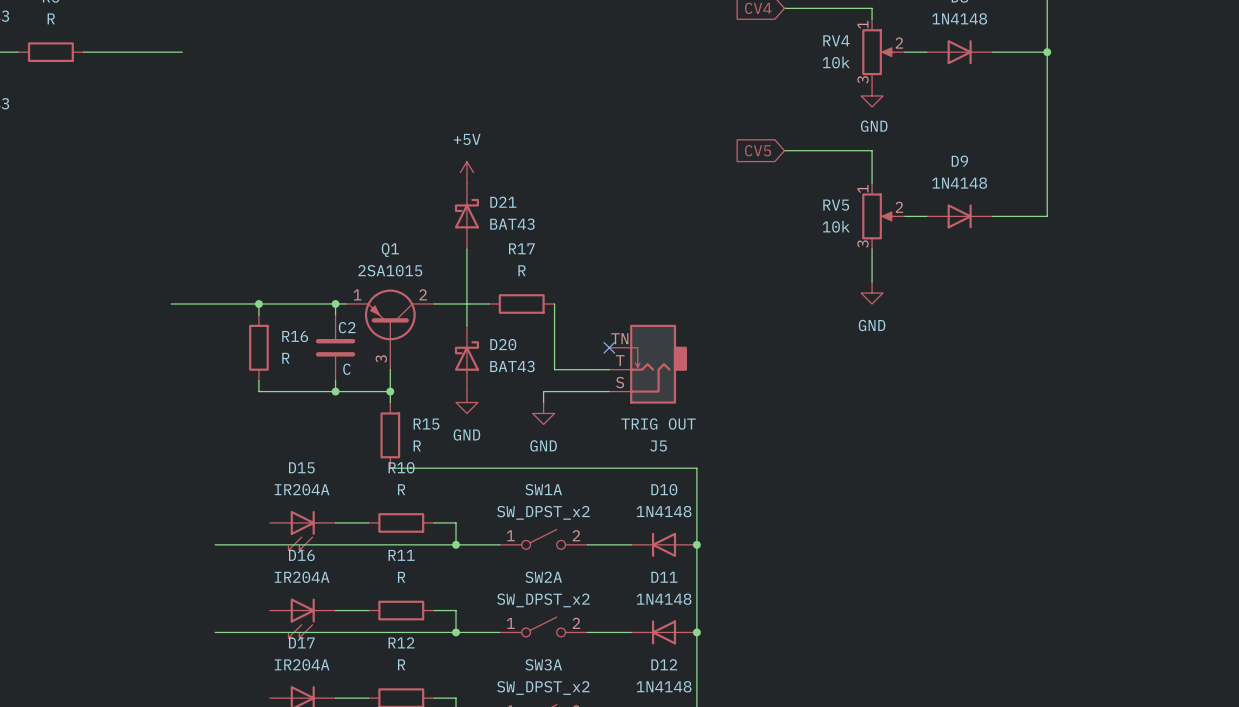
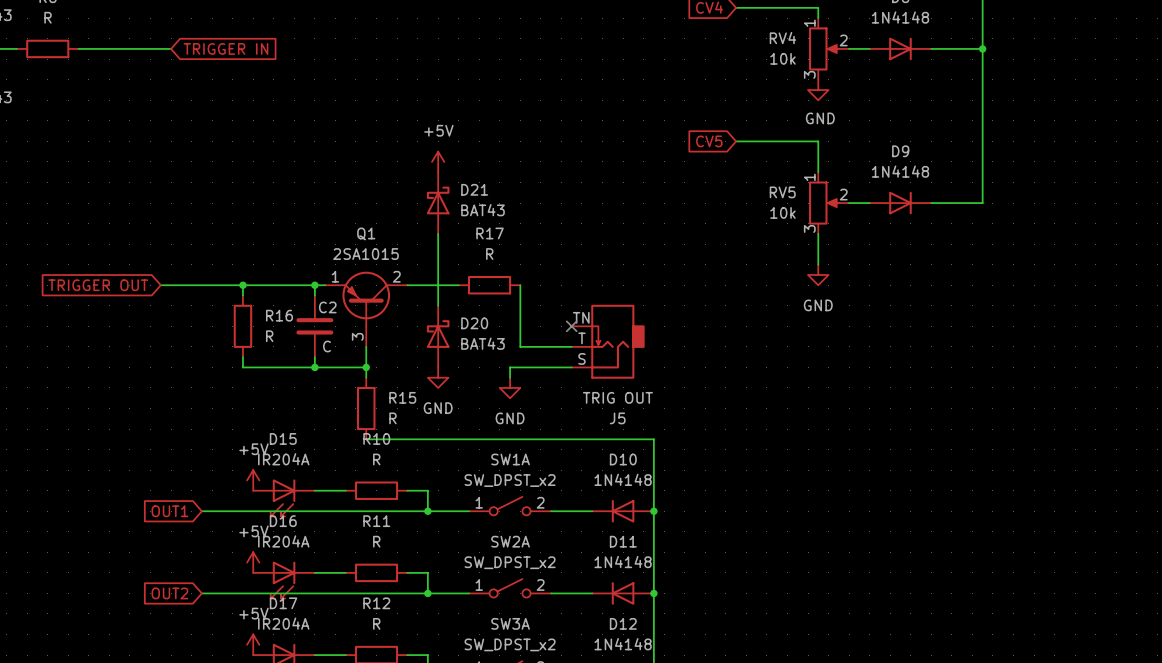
global label: none -> TRIGGER IN (225, 48)
global label: none -> TRIGGER OUT (98, 285)
power symbol: none -> +5V (253, 480)
global label: none -> OUT1 (169, 511)
power symbol: none -> +5V (253, 562)
global label: none -> OUT2 (169, 593)
power symbol: none -> +5V (253, 644)

